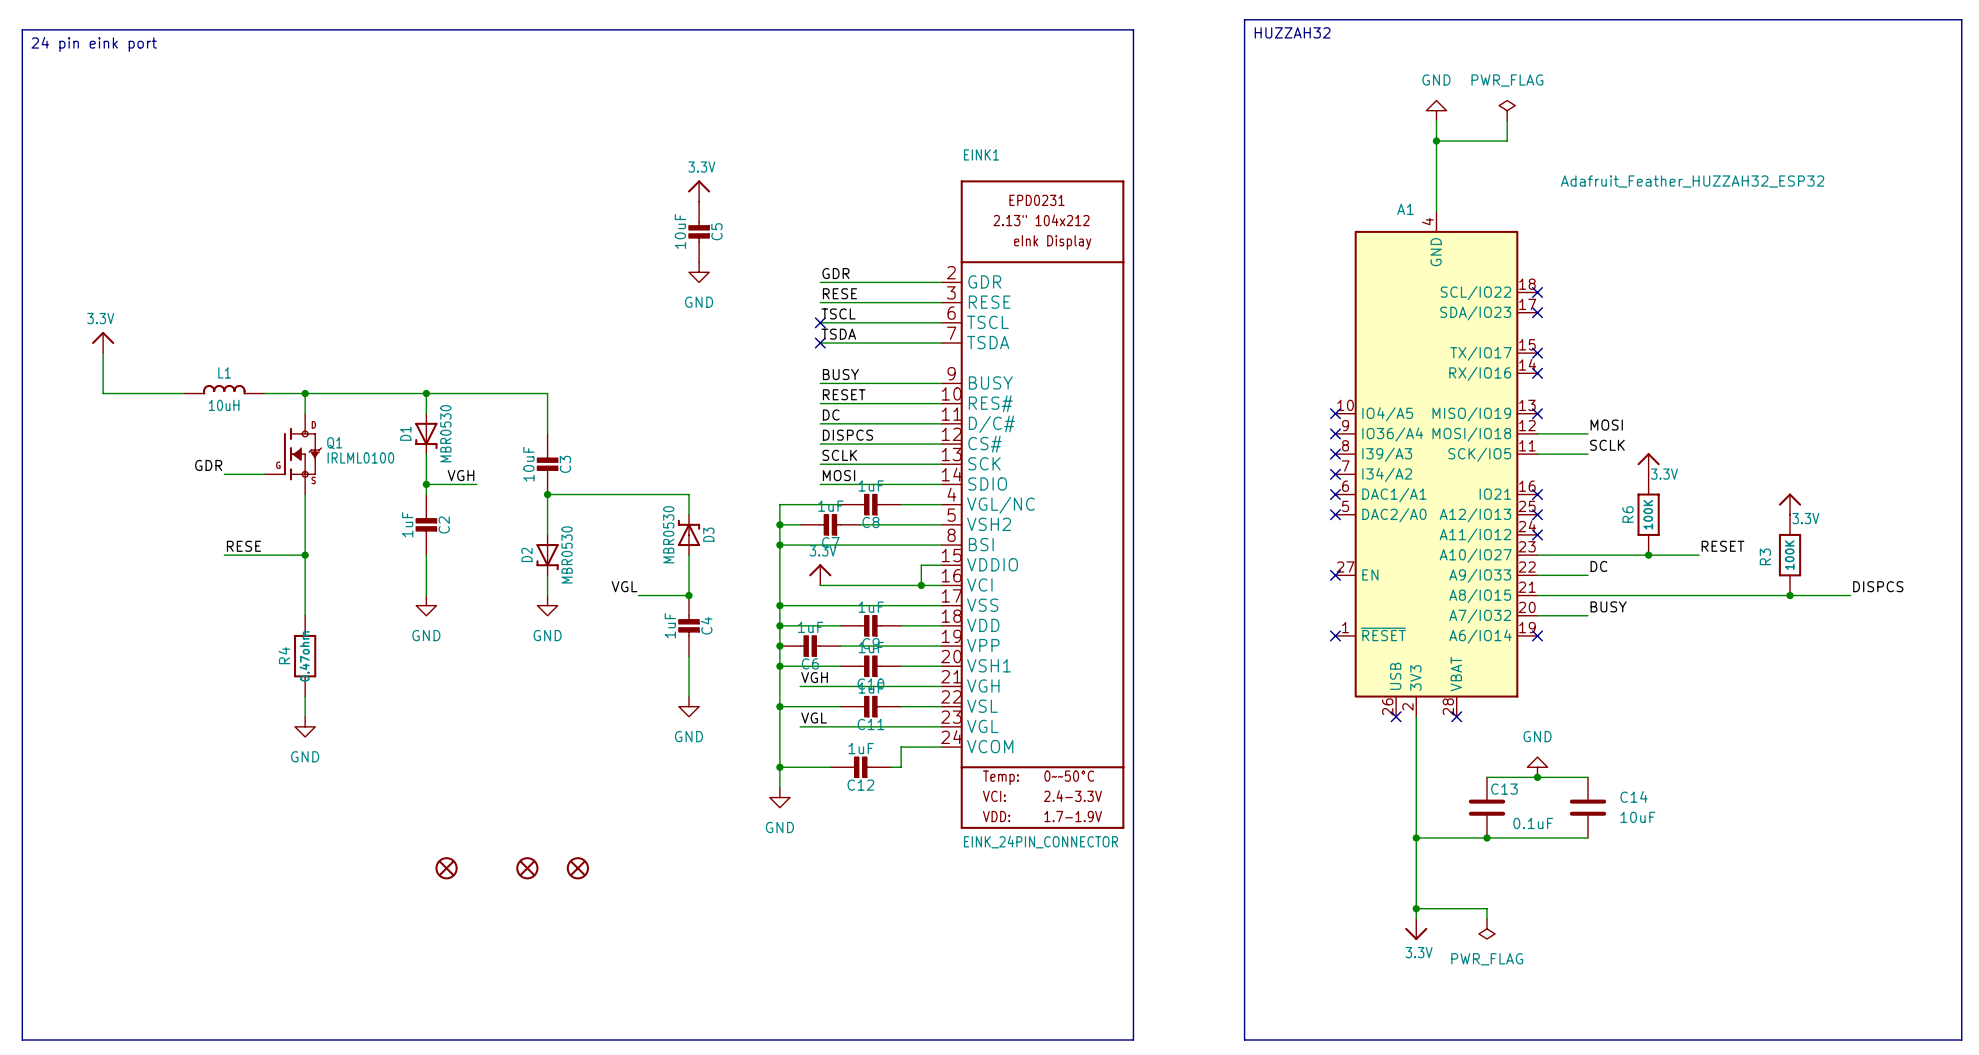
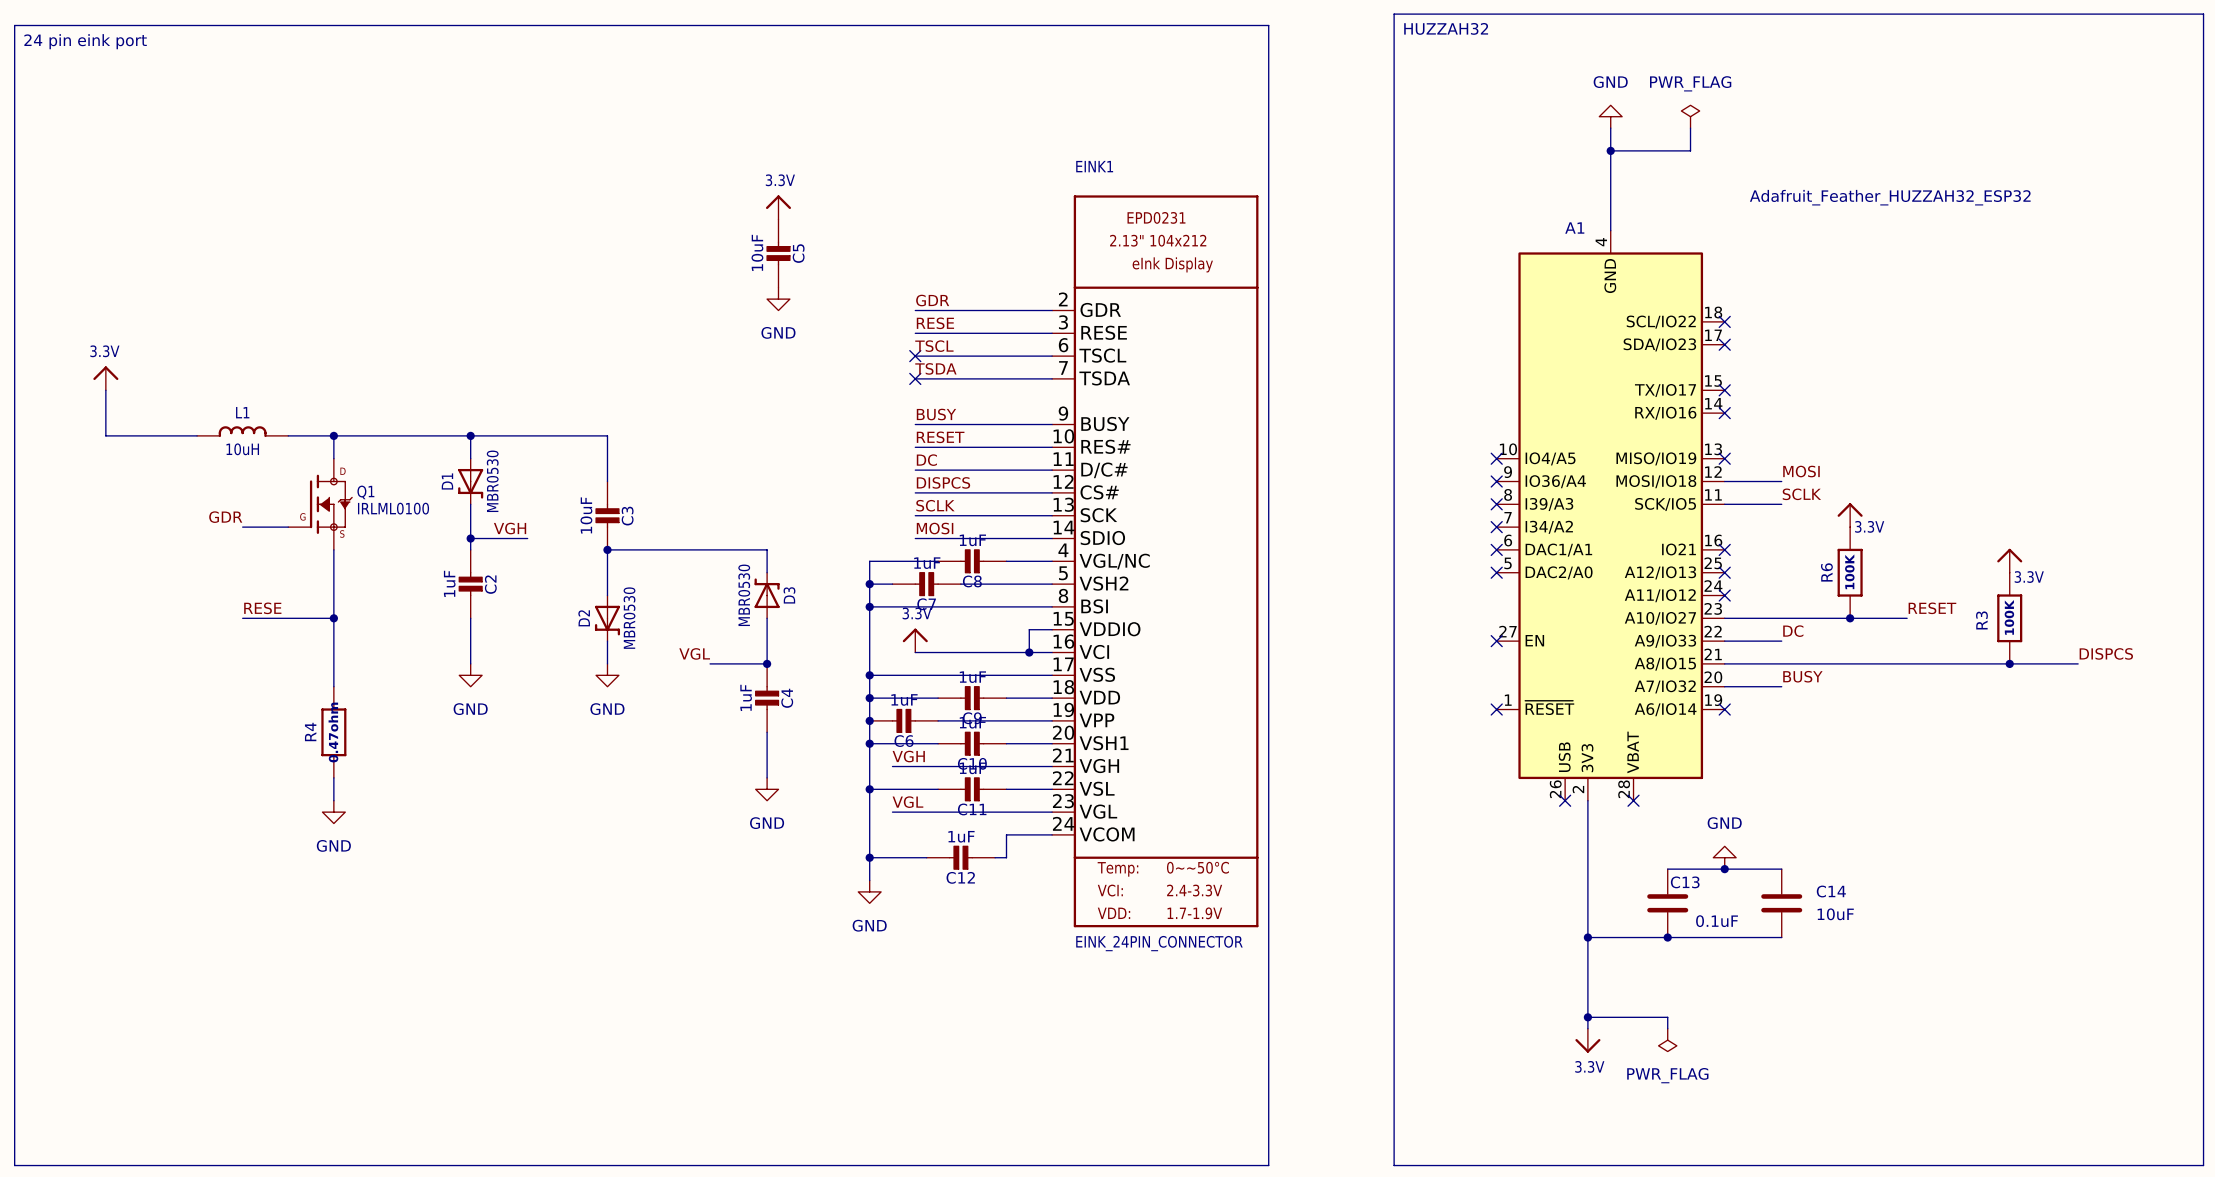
part: (446, 868) -> none
part: (527, 868) -> none
part: (577, 868) -> none

